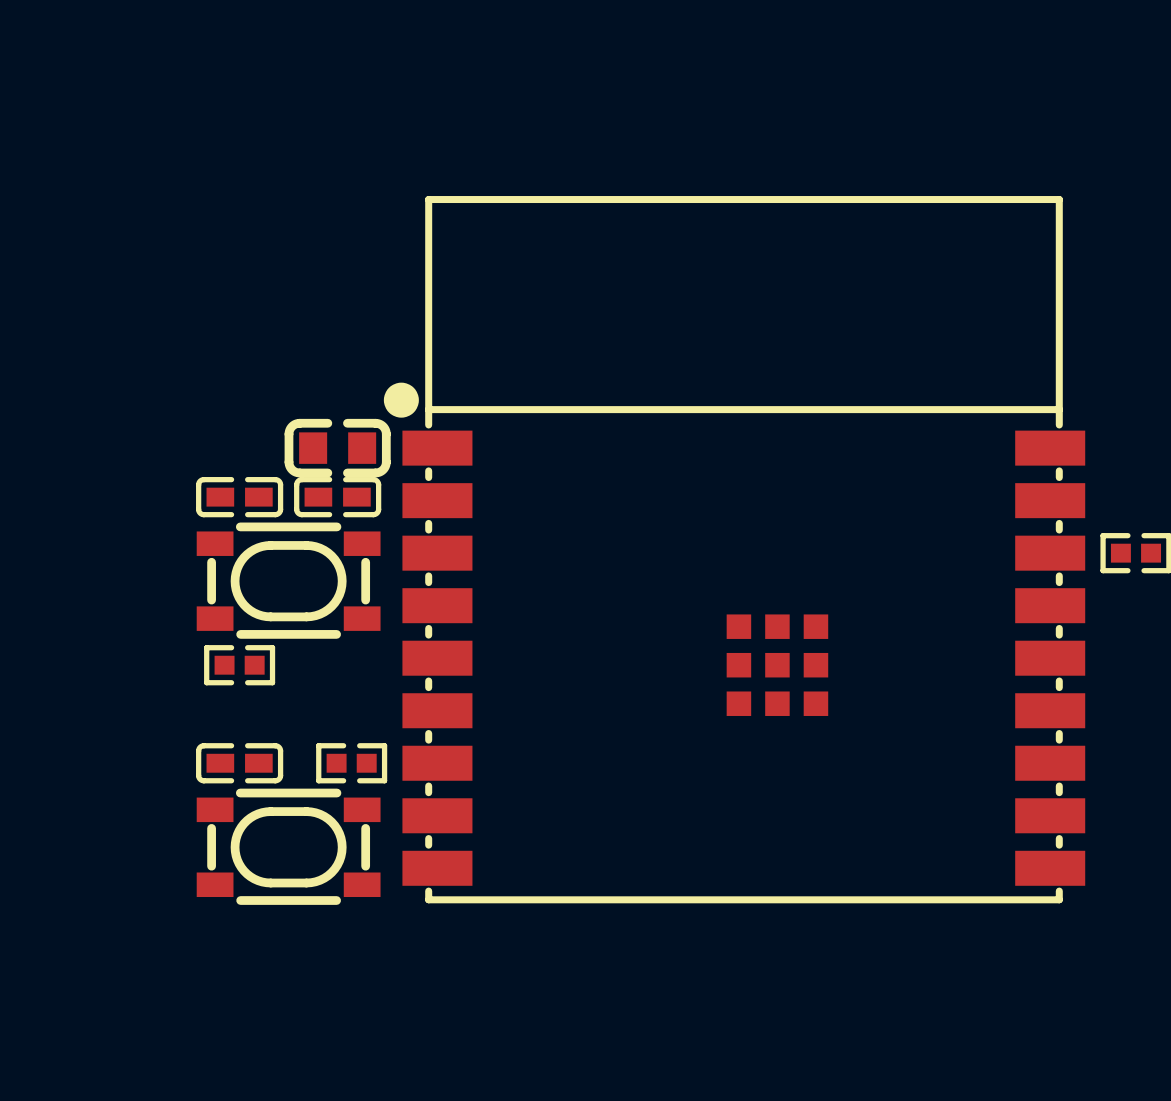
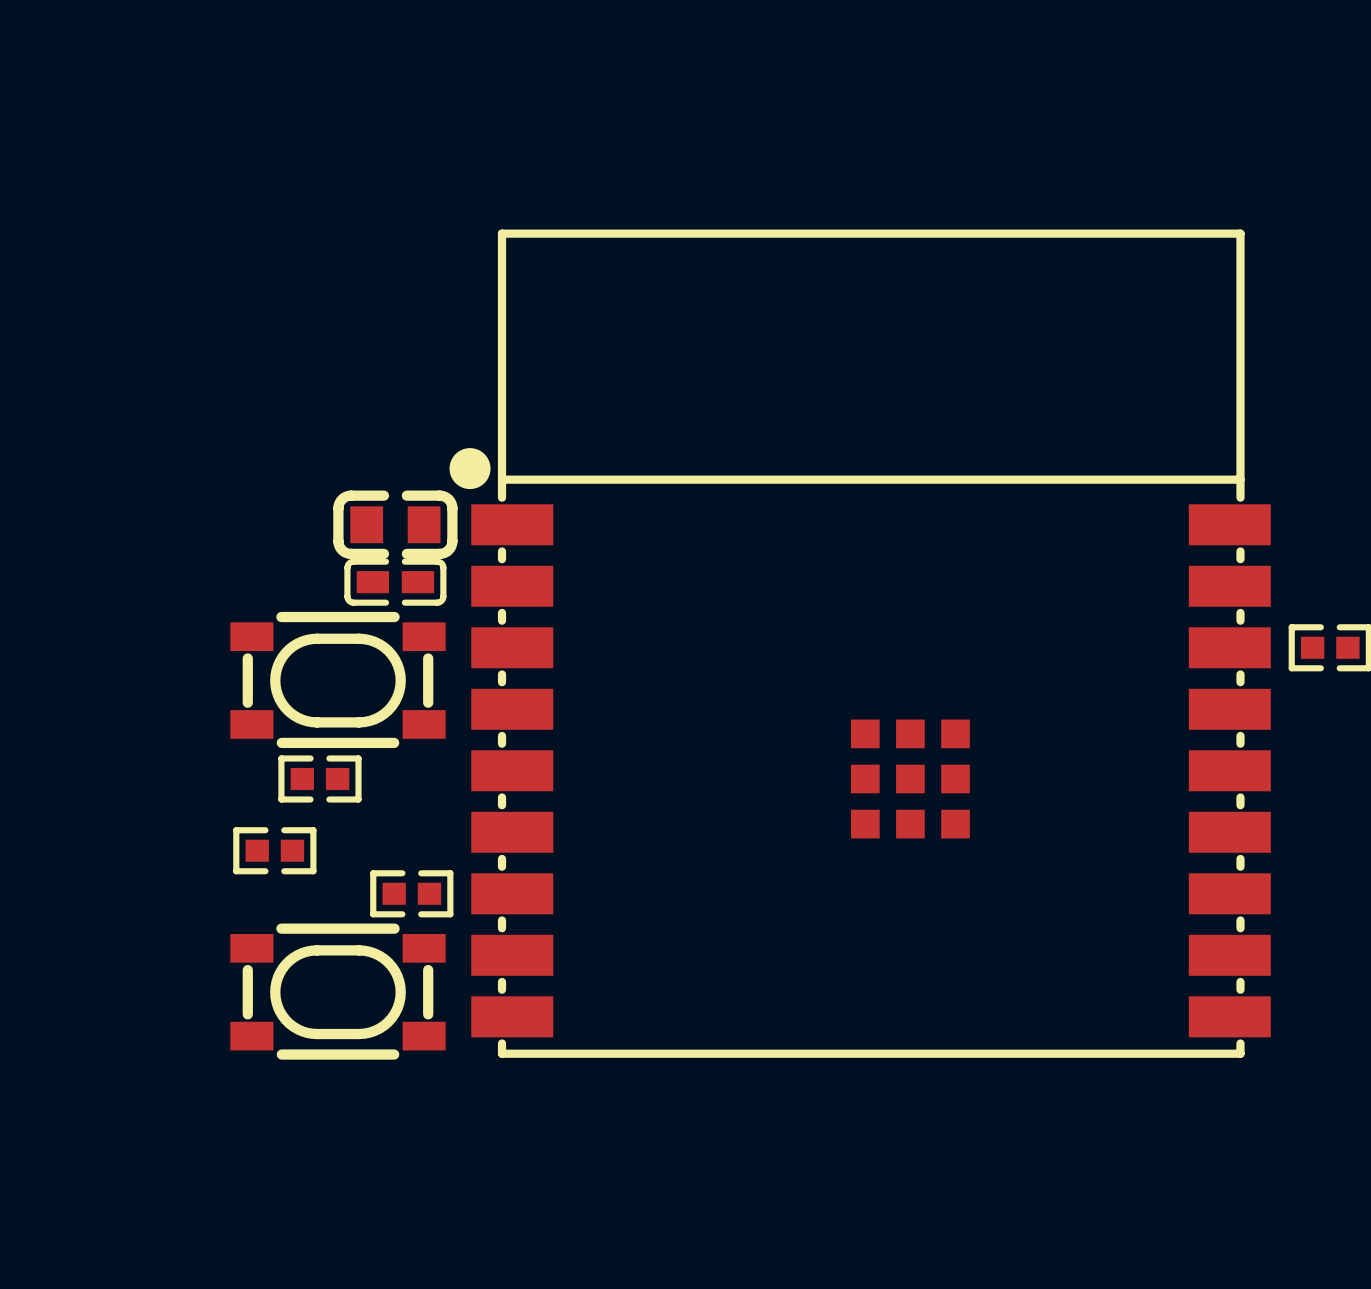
part: (239, 497) -> none
part: (239, 665) -> none
part: none -> (319, 778)
part: none -> (274, 850)
part: (239, 763) -> none

